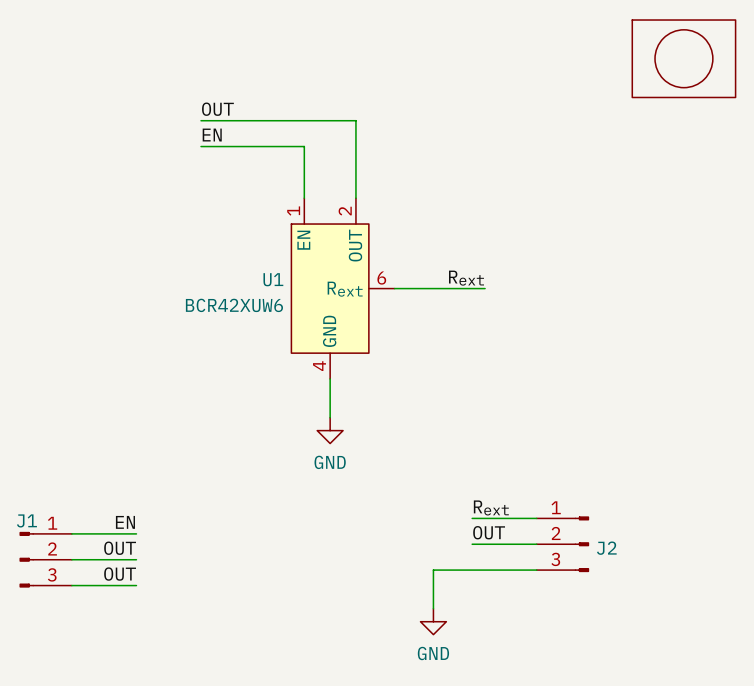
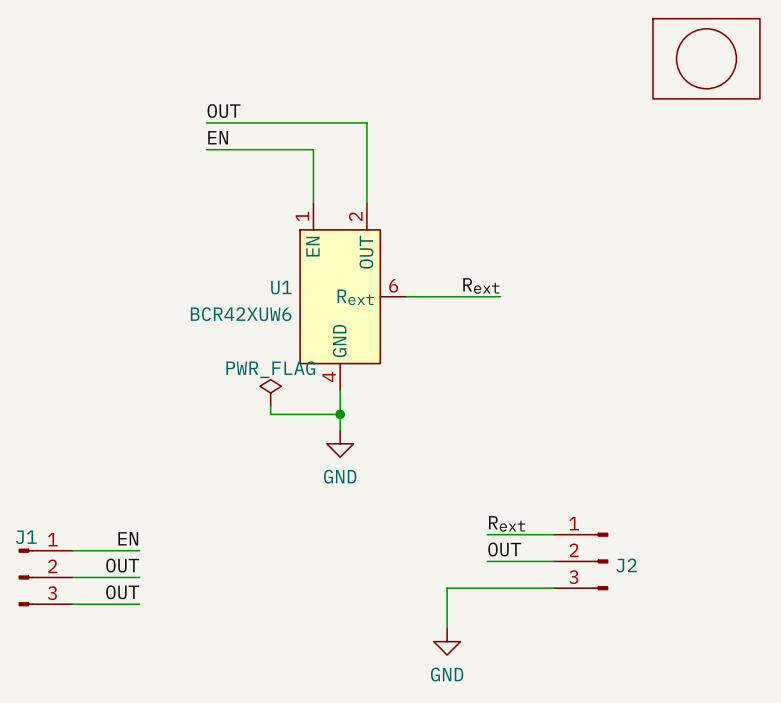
power symbol: none -> PWR_FLAG (270, 392)
wire: none -> (270, 406) (270, 414) (340, 414)
junction: none -> (340, 414)

